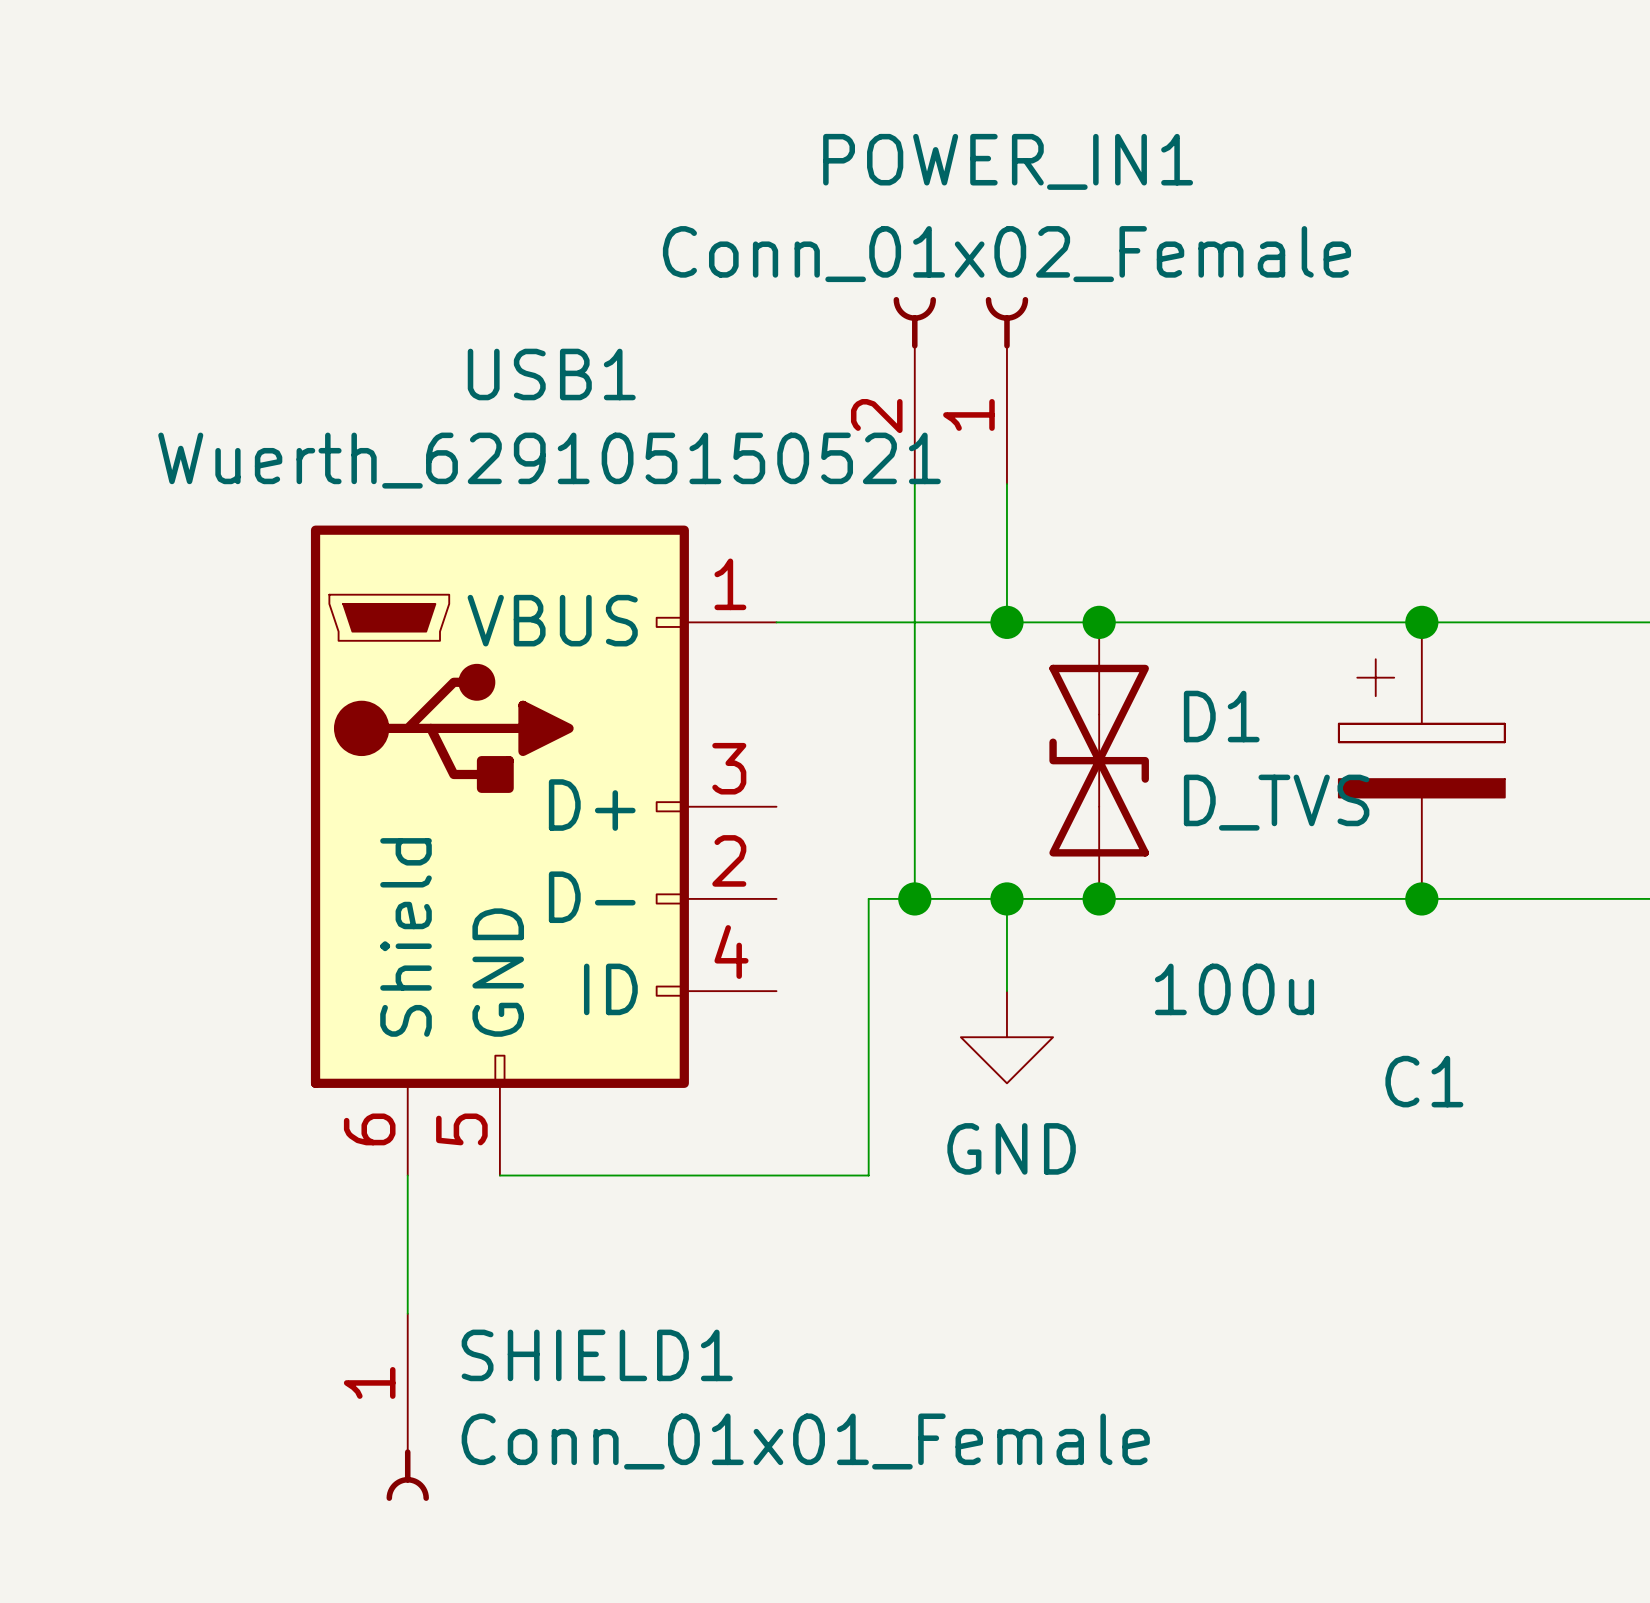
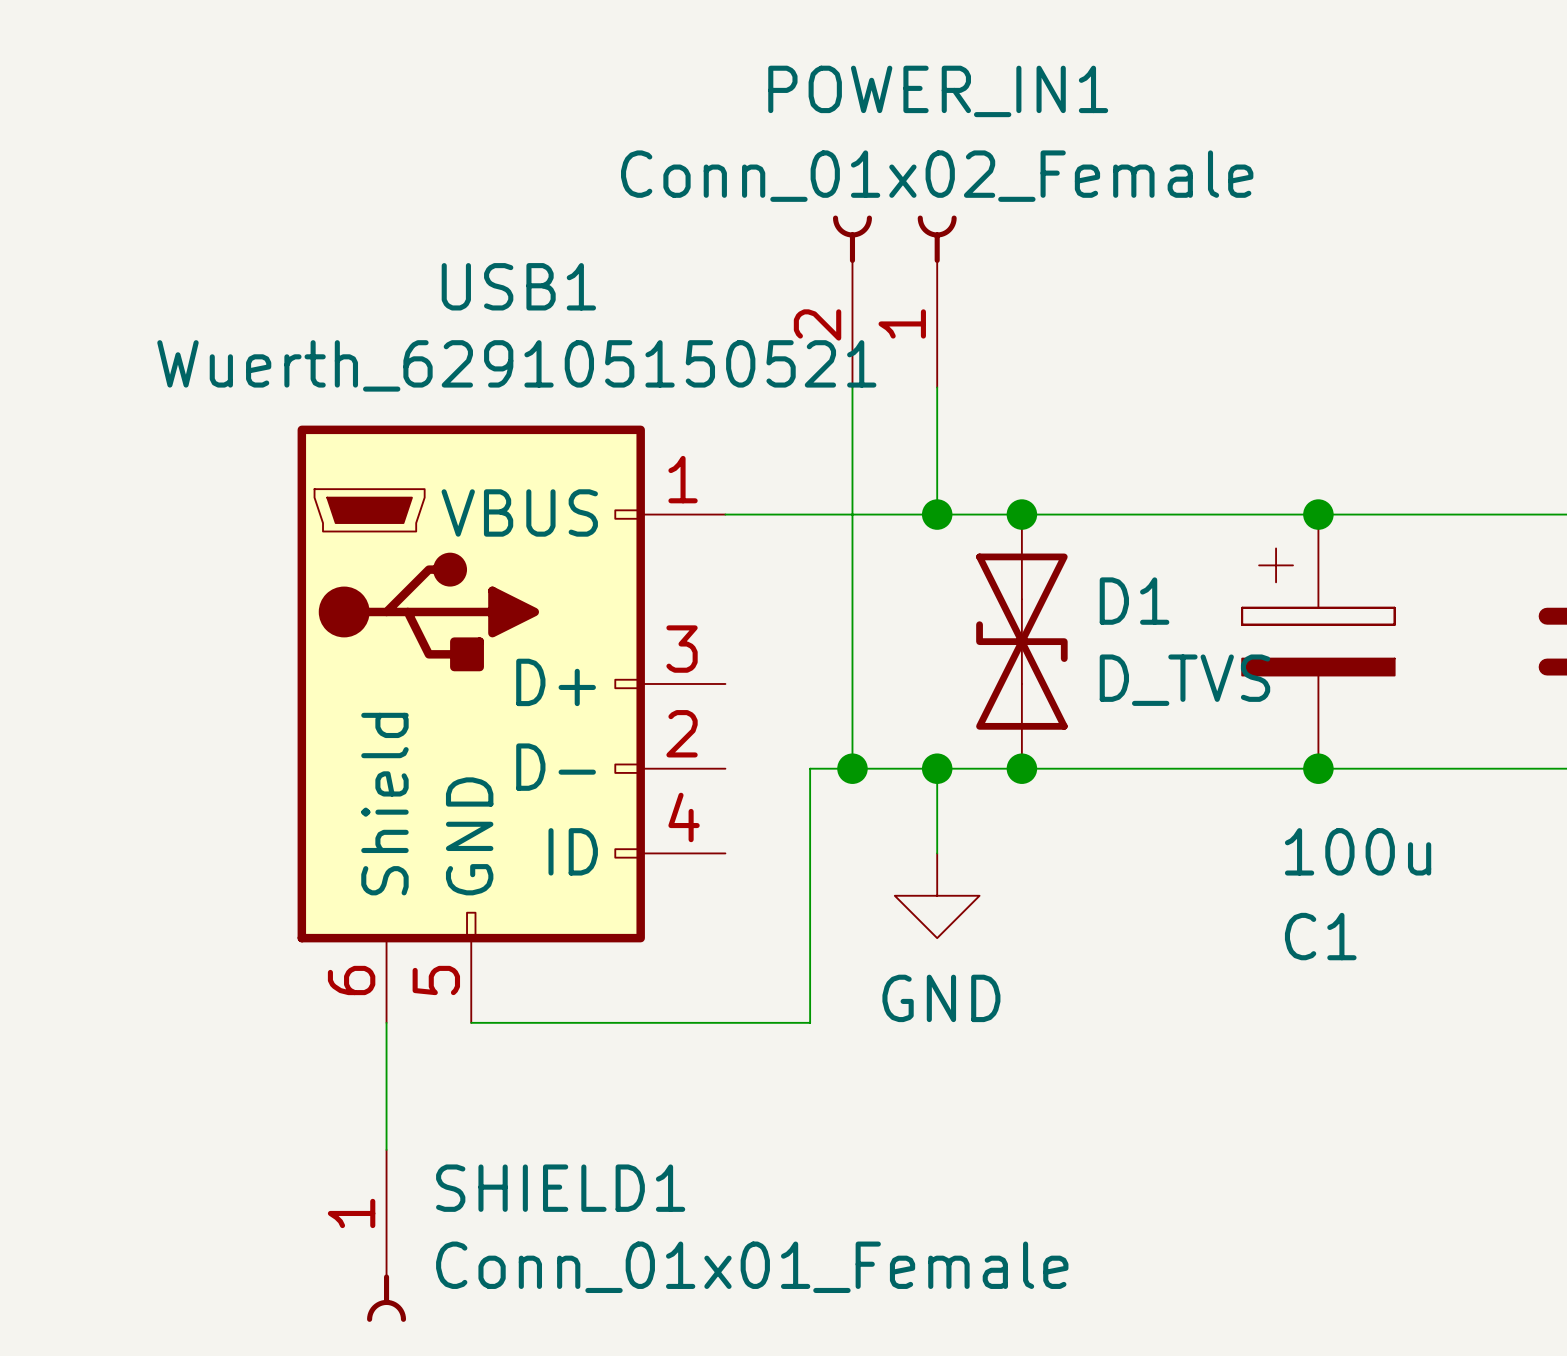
C1 value position: 100u (1234, 989) -> 100u (1358, 851)

